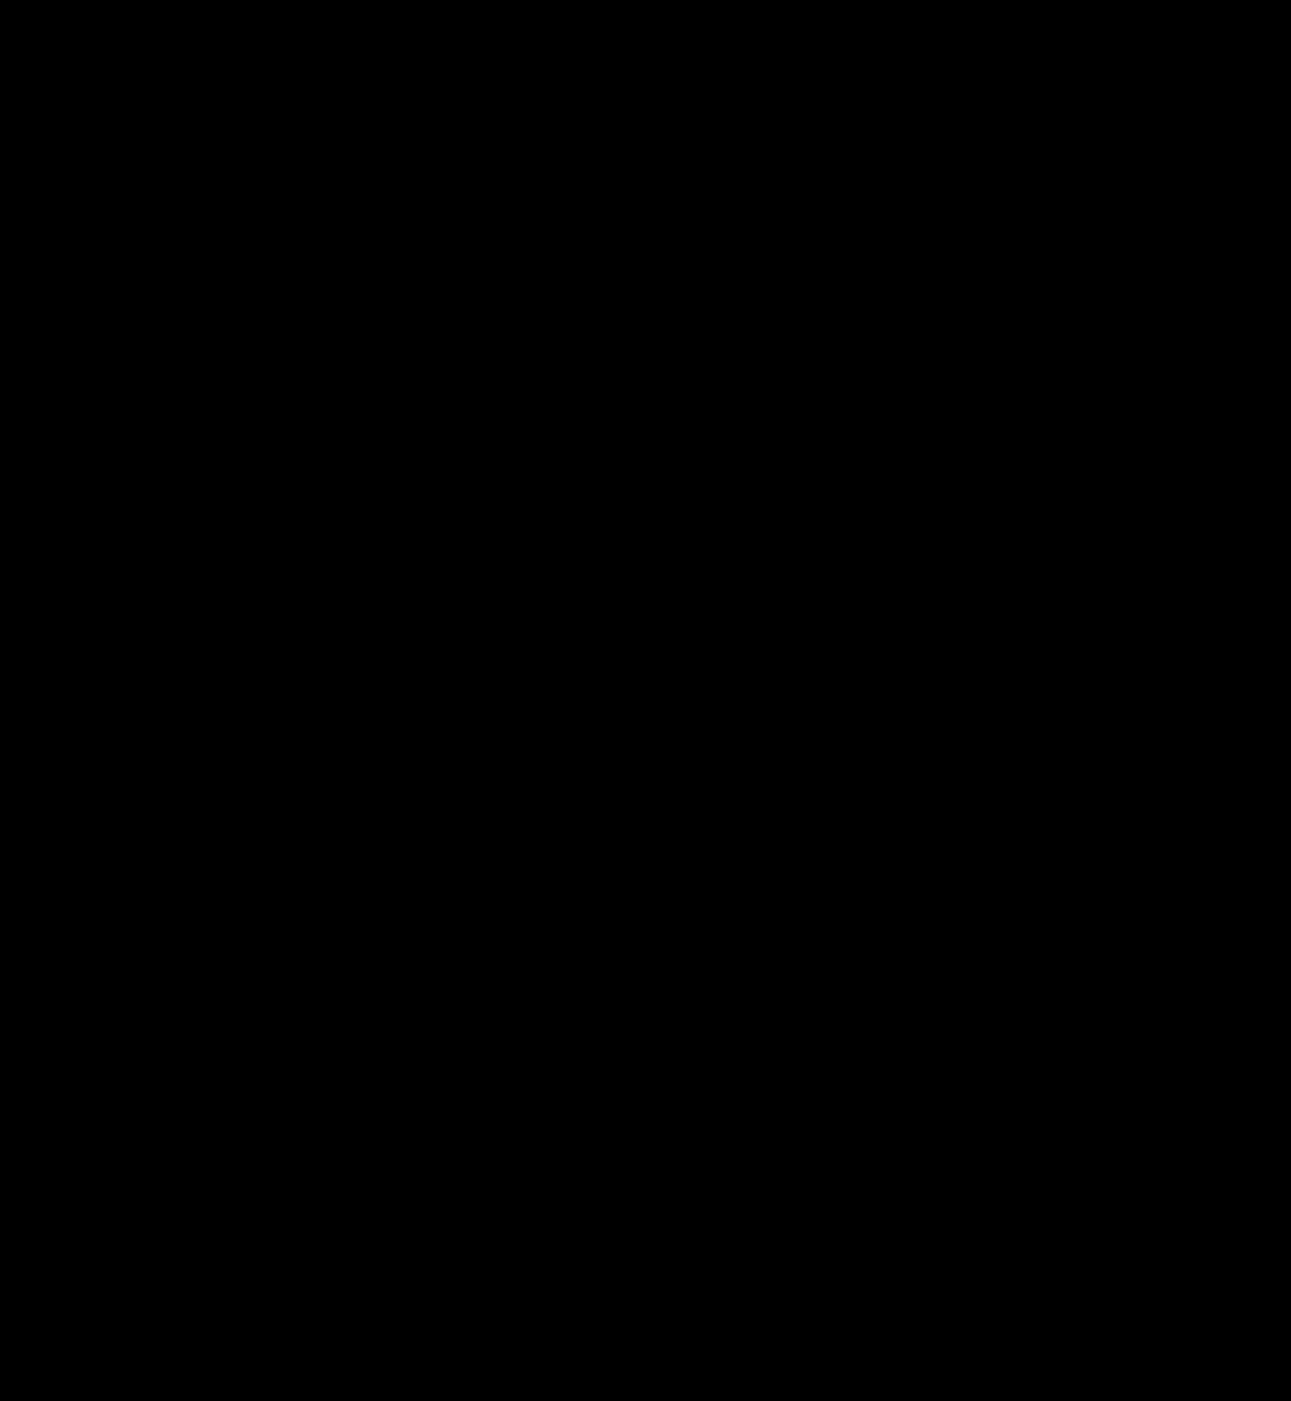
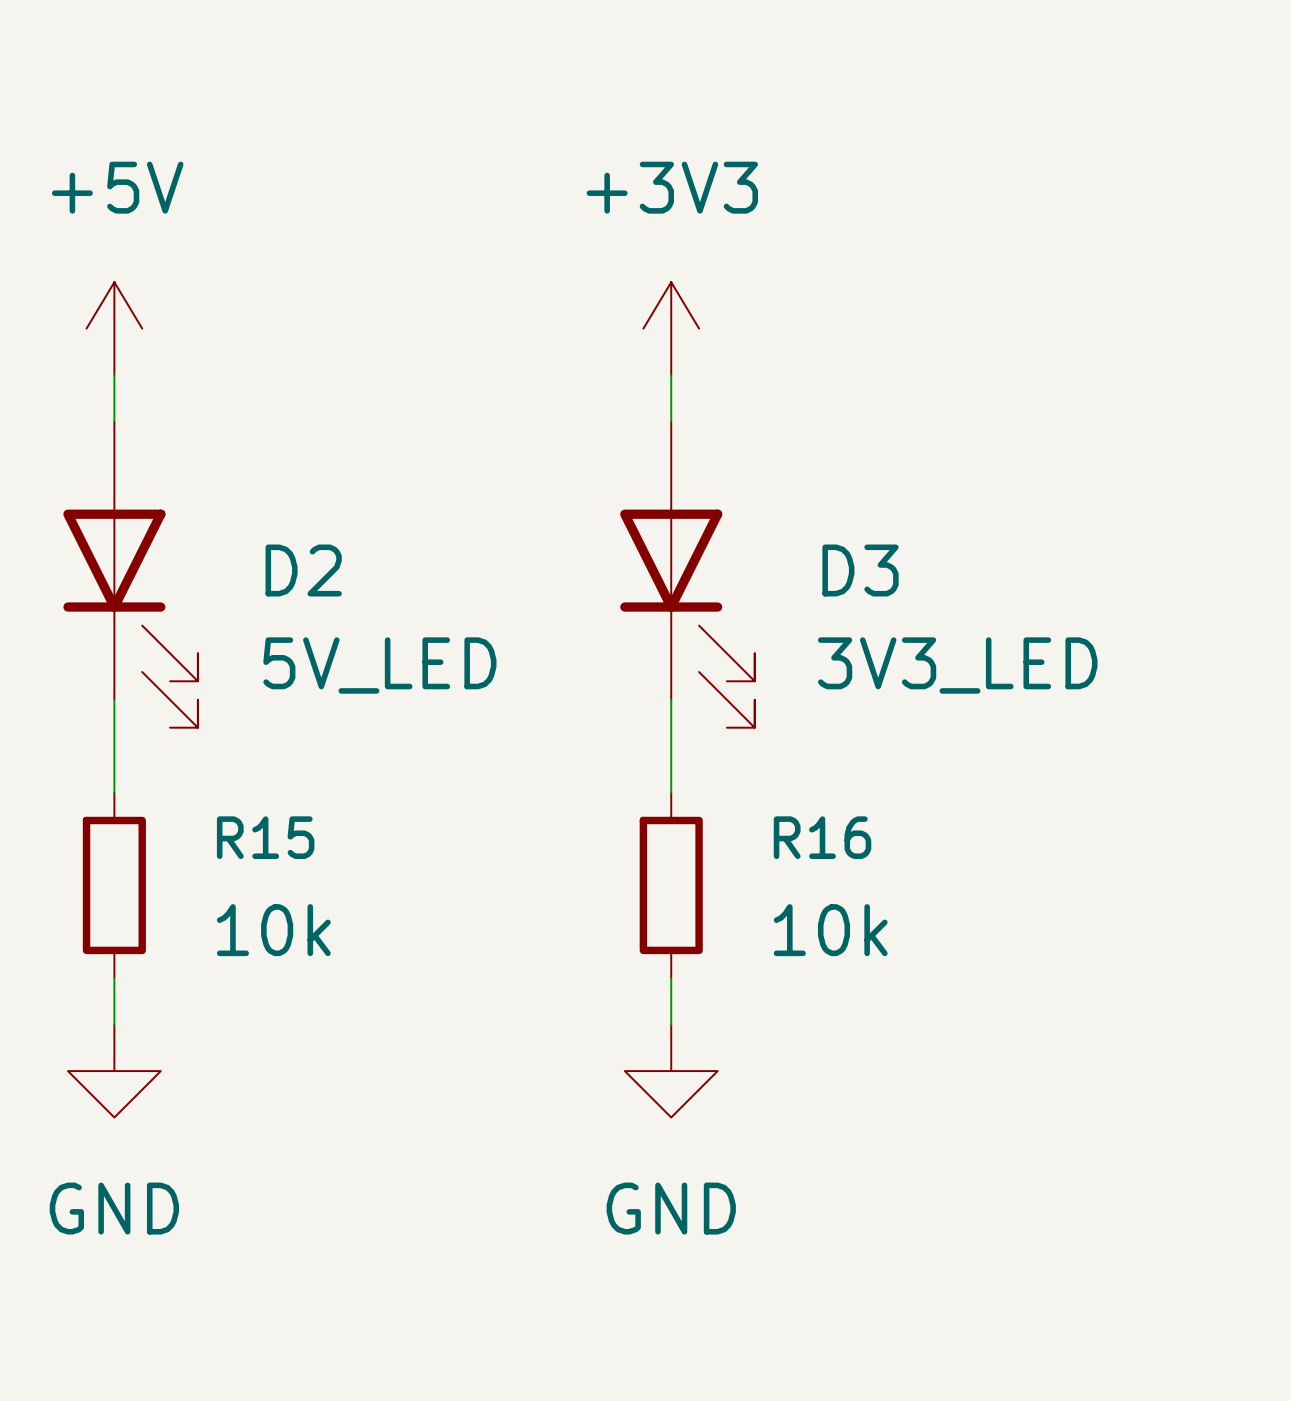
power symbol: none -> +5V (114, 328)
power symbol: none -> +3V3 (671, 328)
wire: none -> (114, 375) (114, 421)
wire: none -> (671, 375) (671, 421)
D2: none -> 5V_LED (130, 574)
D3: none -> 3V3_LED (687, 574)
wire: none -> (114, 699) (114, 792)
wire: none -> (671, 699) (671, 792)
R15: none -> 10k (114, 885)
R16: none -> 10k (671, 885)
wire: none -> (114, 978) (114, 1024)
wire: none -> (671, 978) (671, 1024)
power symbol: none -> GND (114, 1071)
power symbol: none -> GND (671, 1071)

